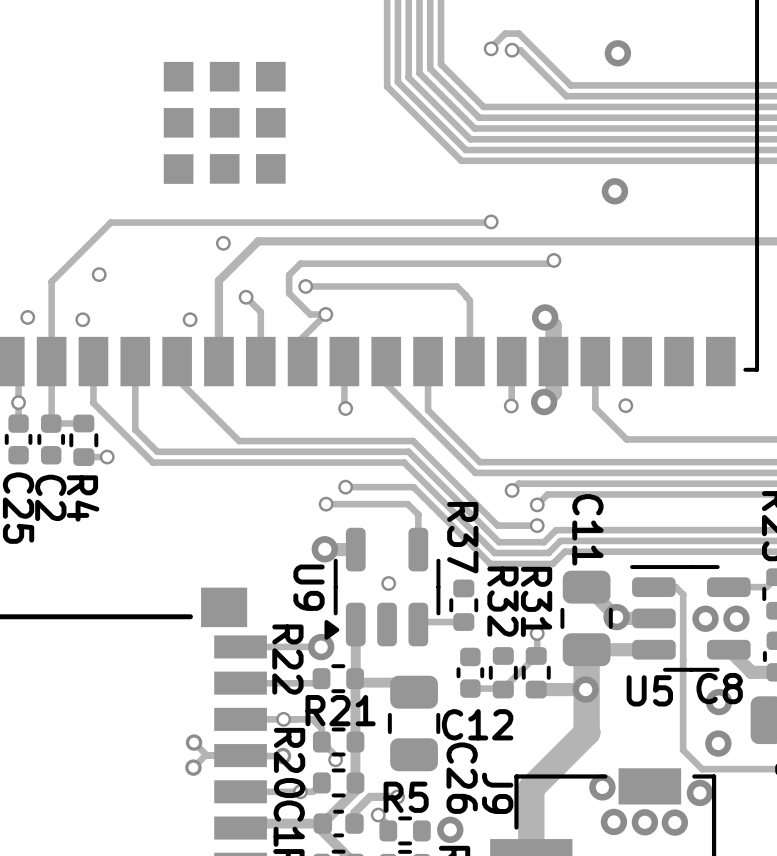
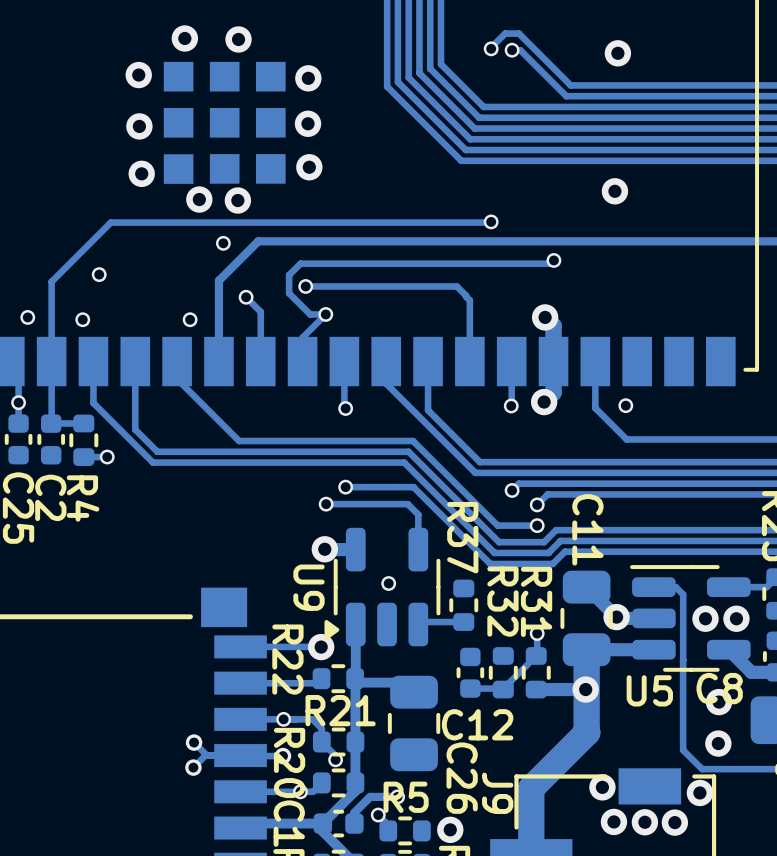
via: none -> (184, 38)
via: none -> (238, 39)
via: none -> (138, 75)
via: none -> (308, 78)
via: none -> (308, 123)
via: none -> (139, 126)
via: none -> (309, 167)
via: none -> (141, 173)
via: none -> (199, 199)
via: none -> (237, 200)

